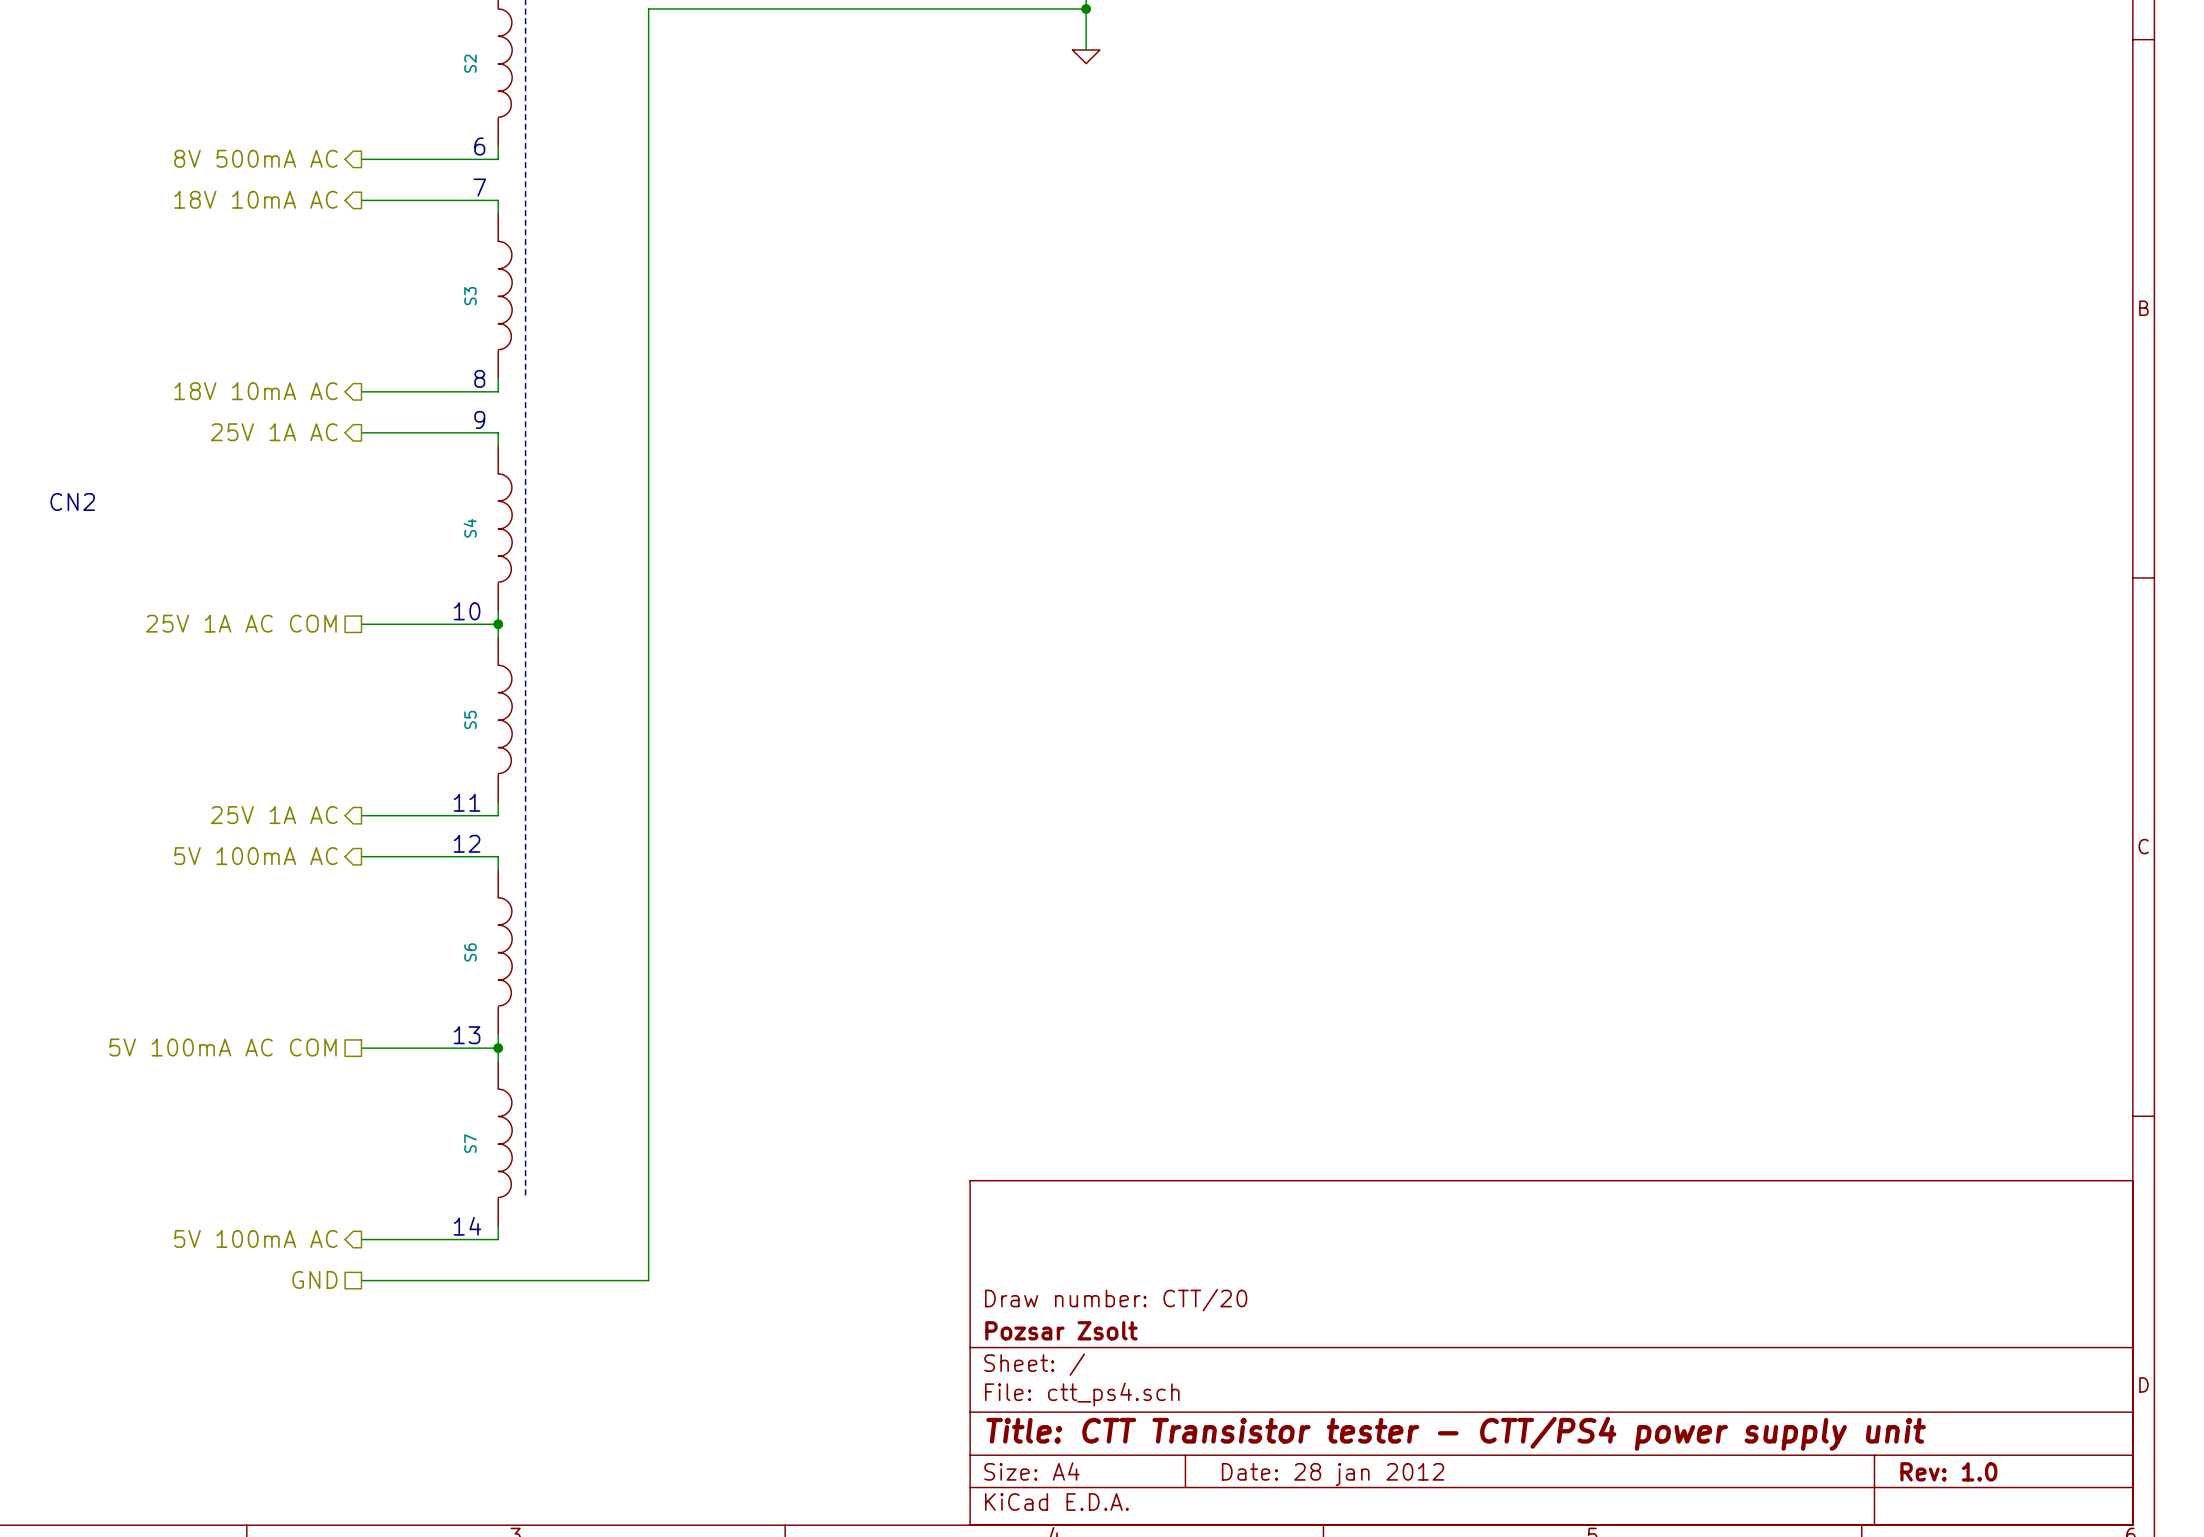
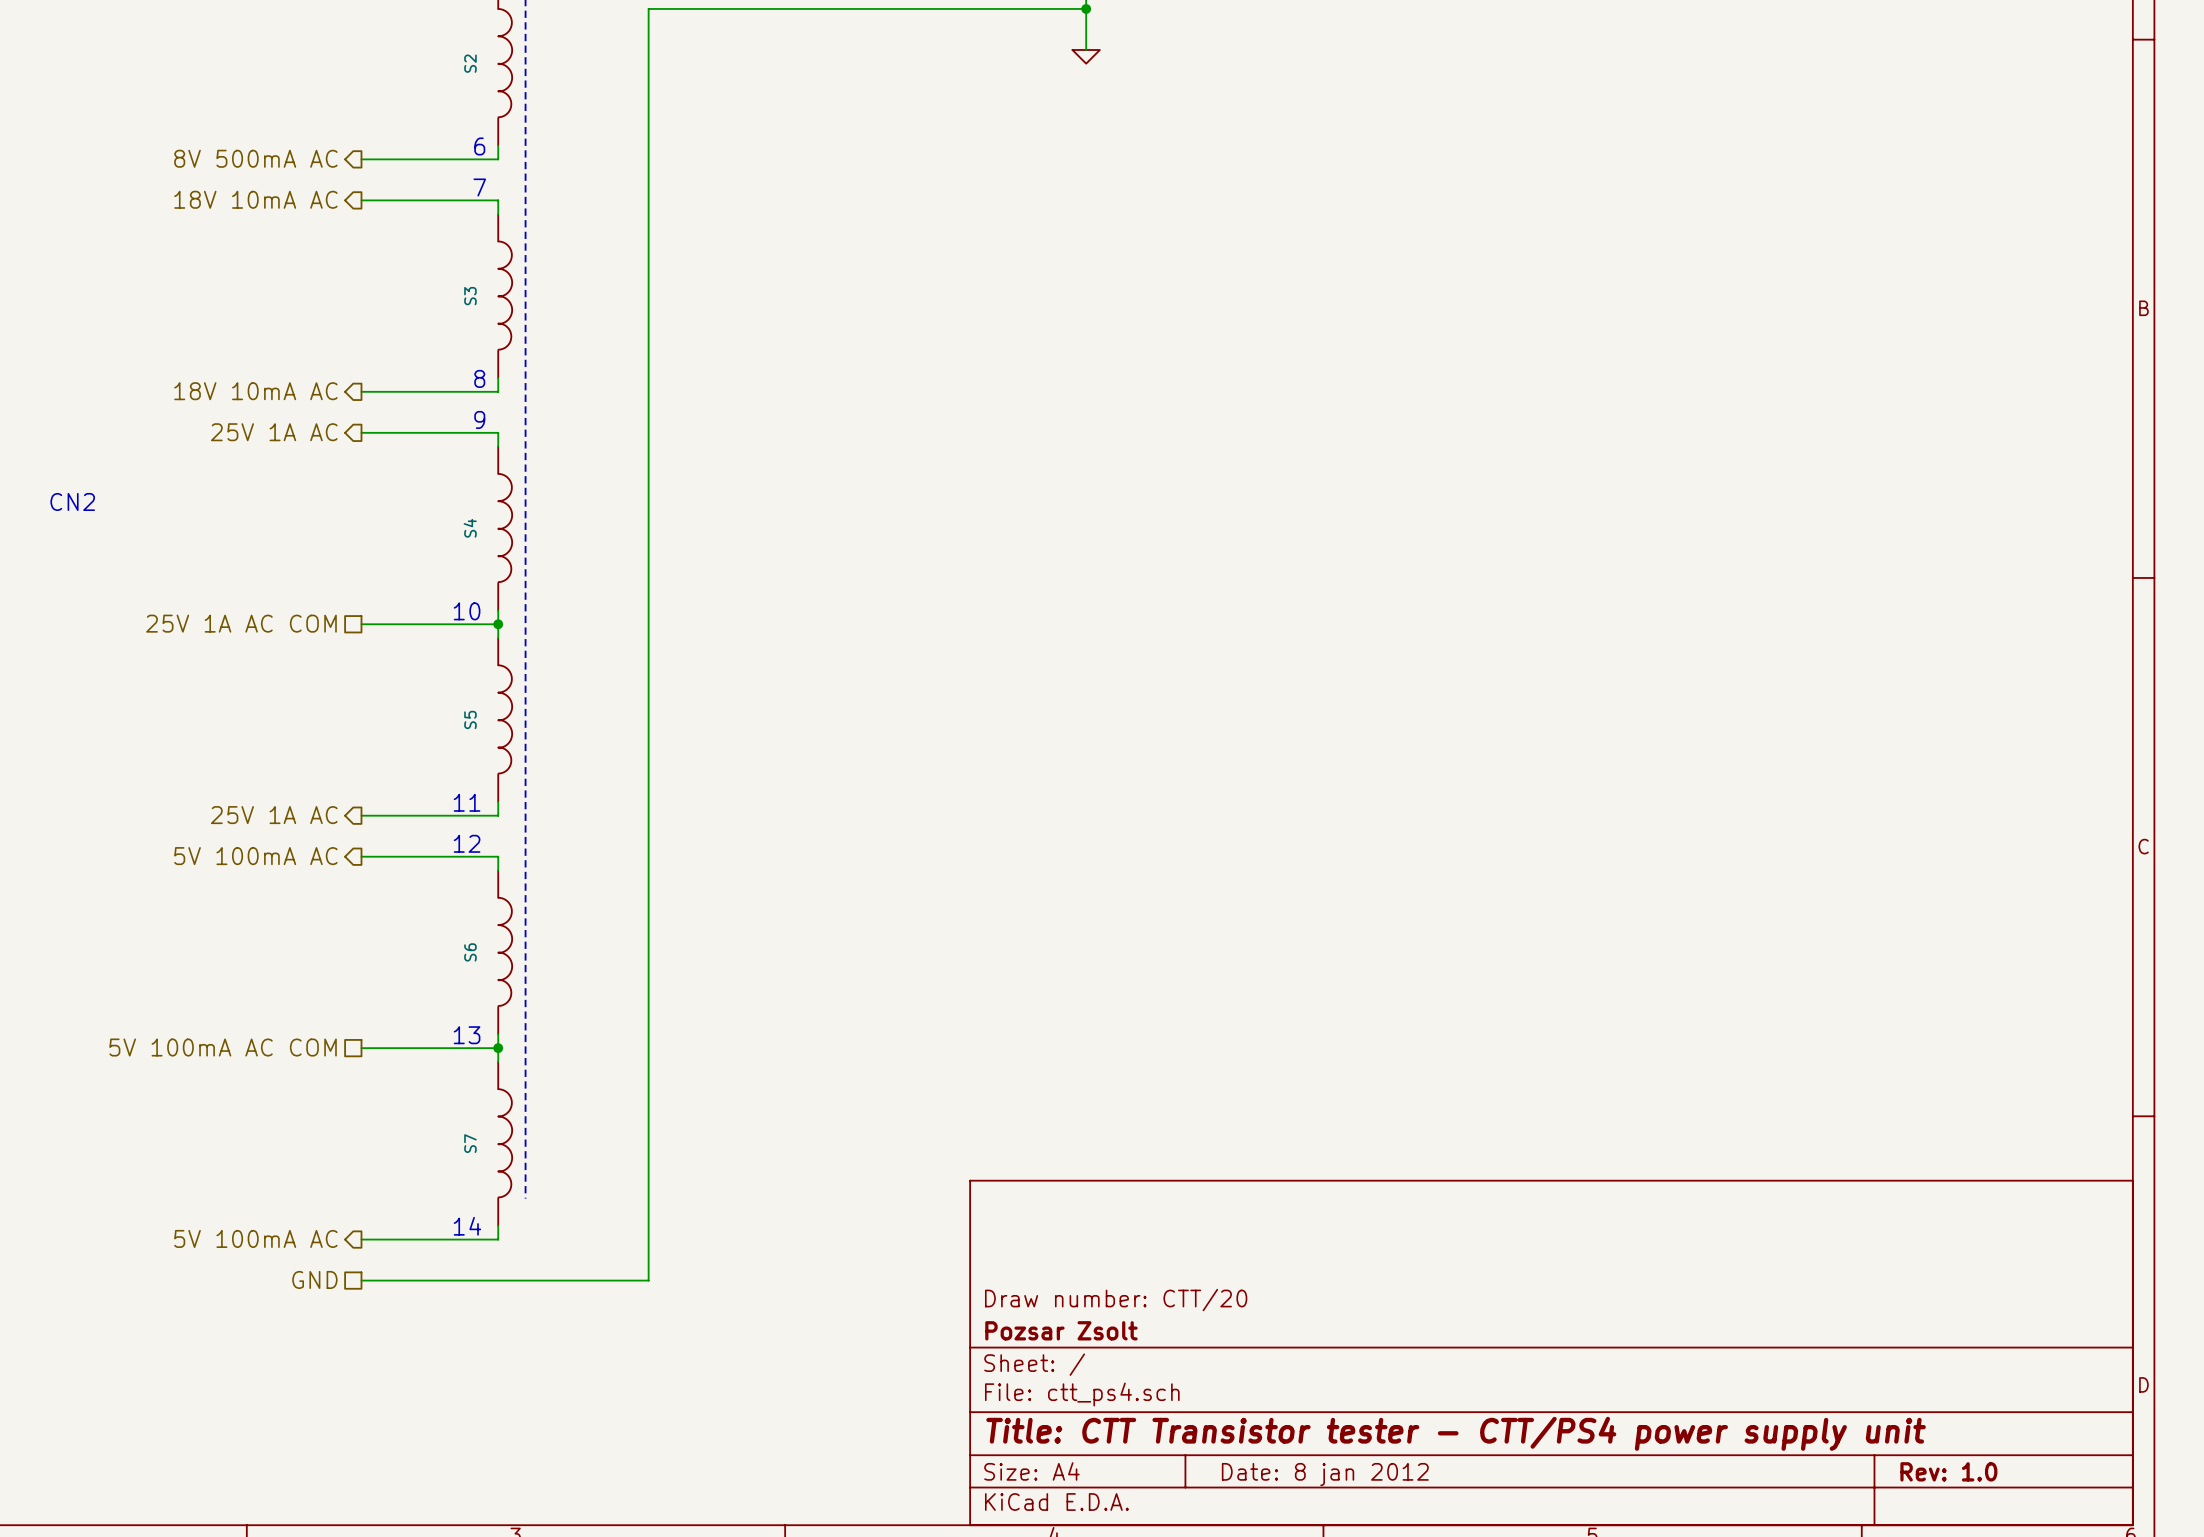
title block: Date: 28 jan 2012 (1333, 1474) -> Date: 8 jan 2012 (1325, 1474)

